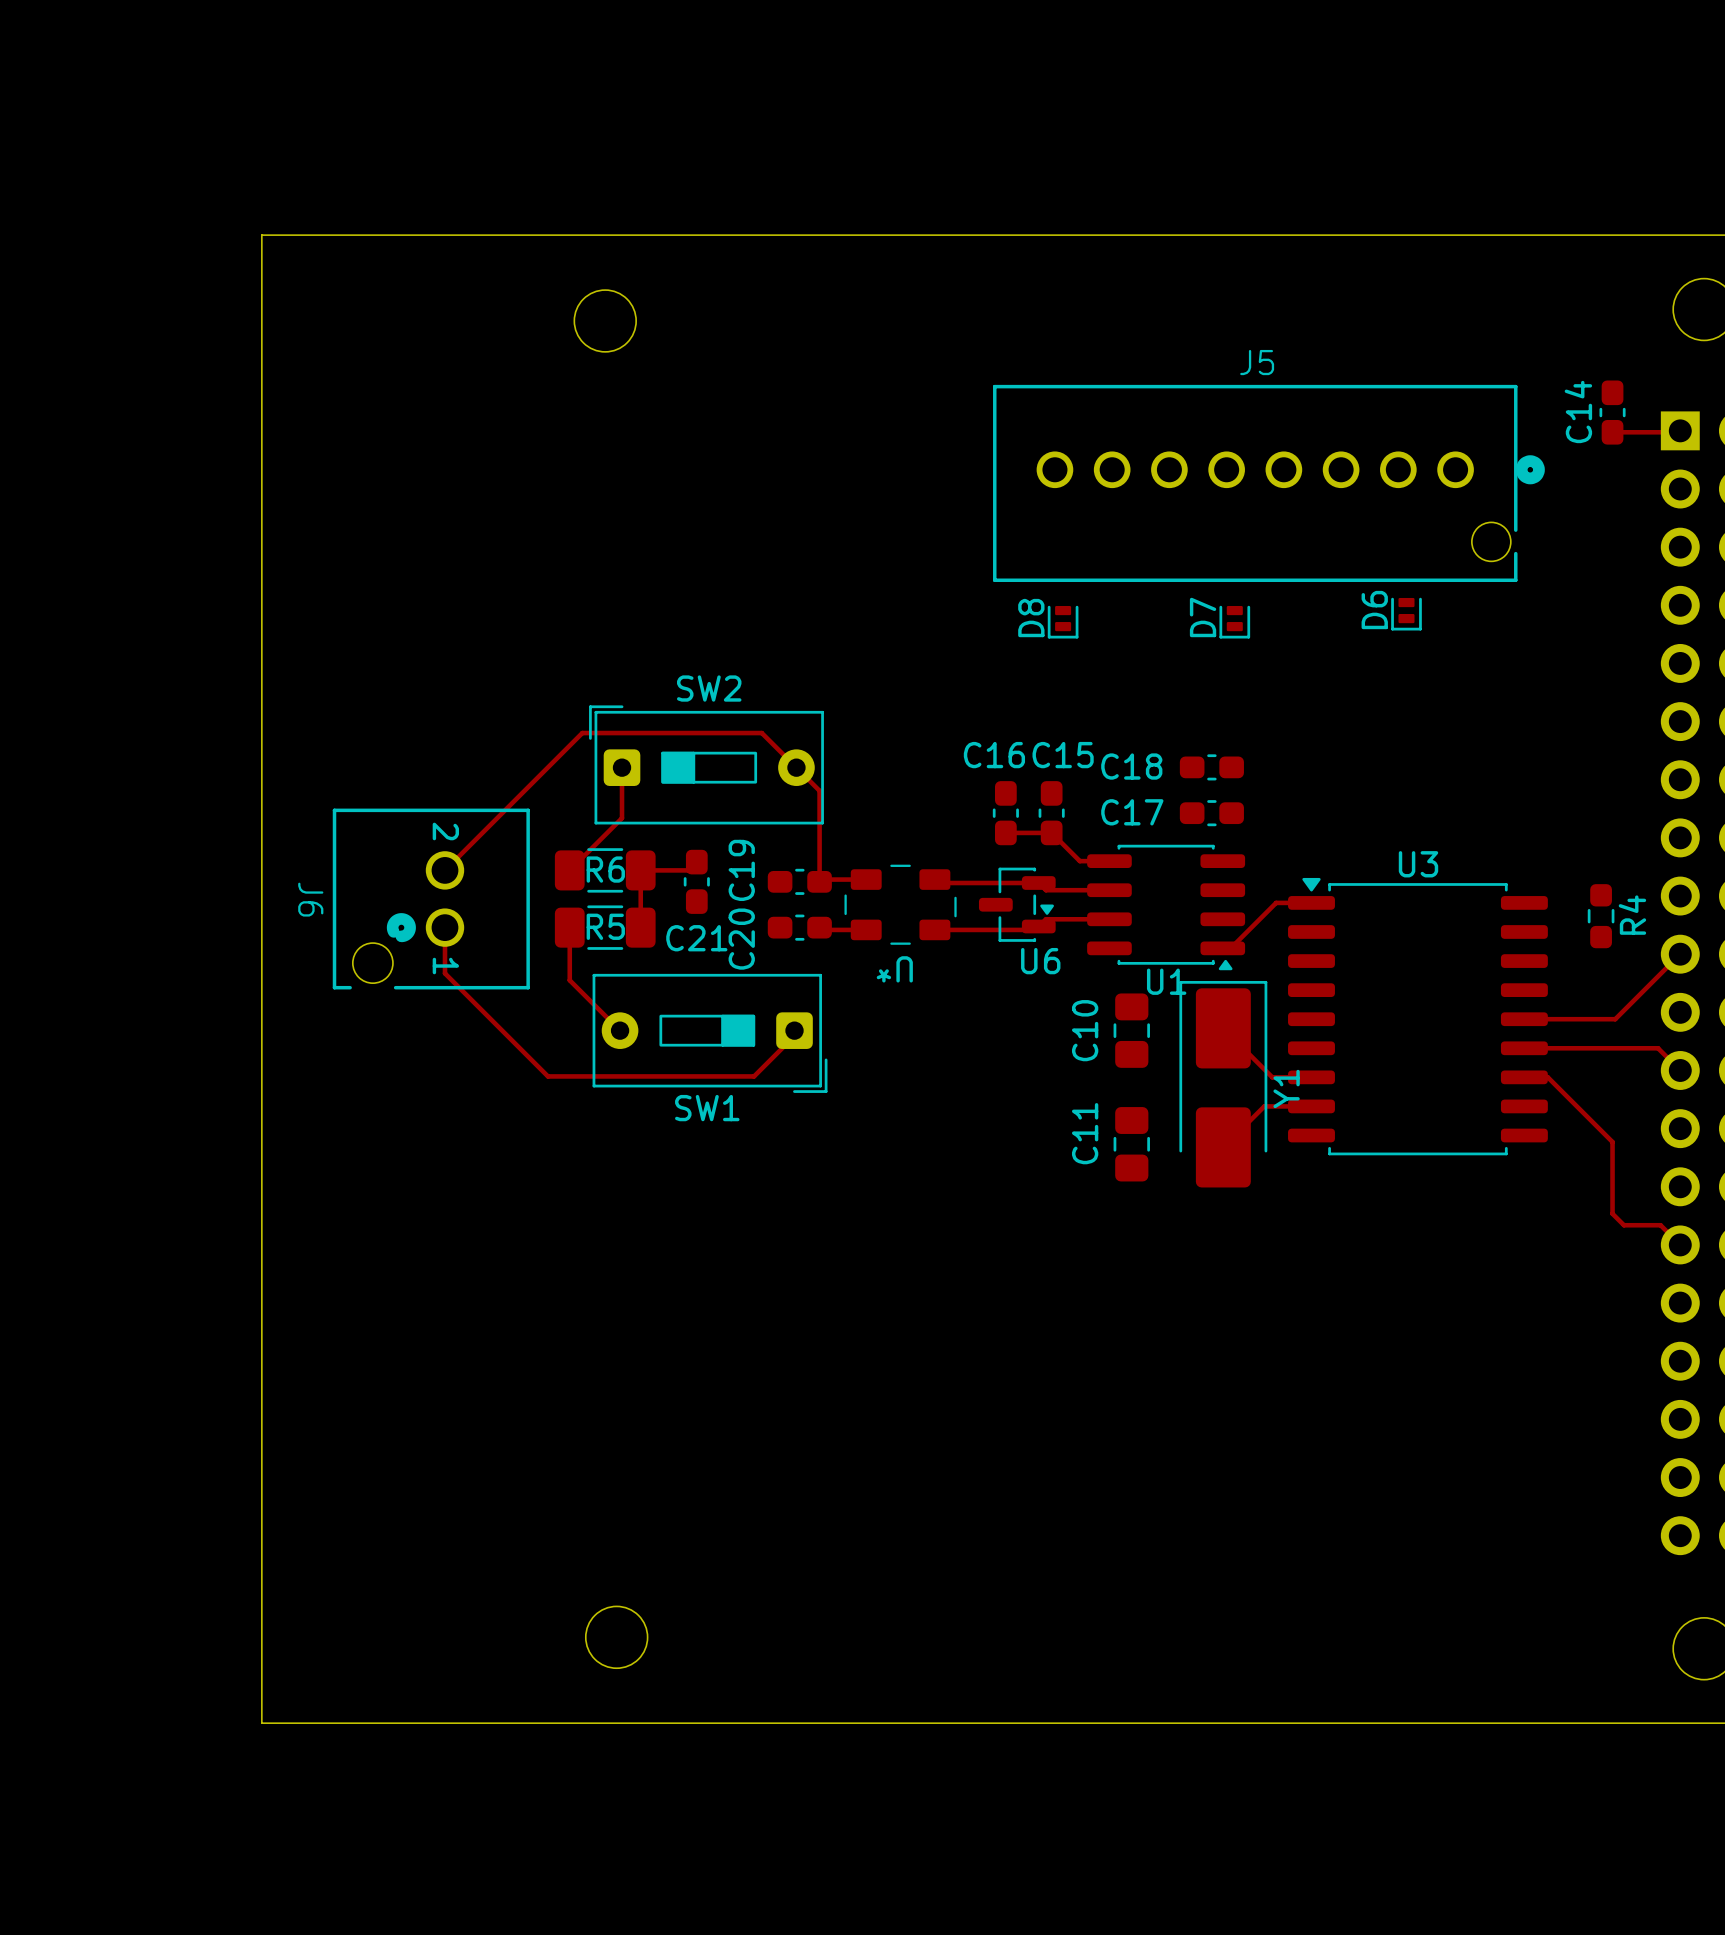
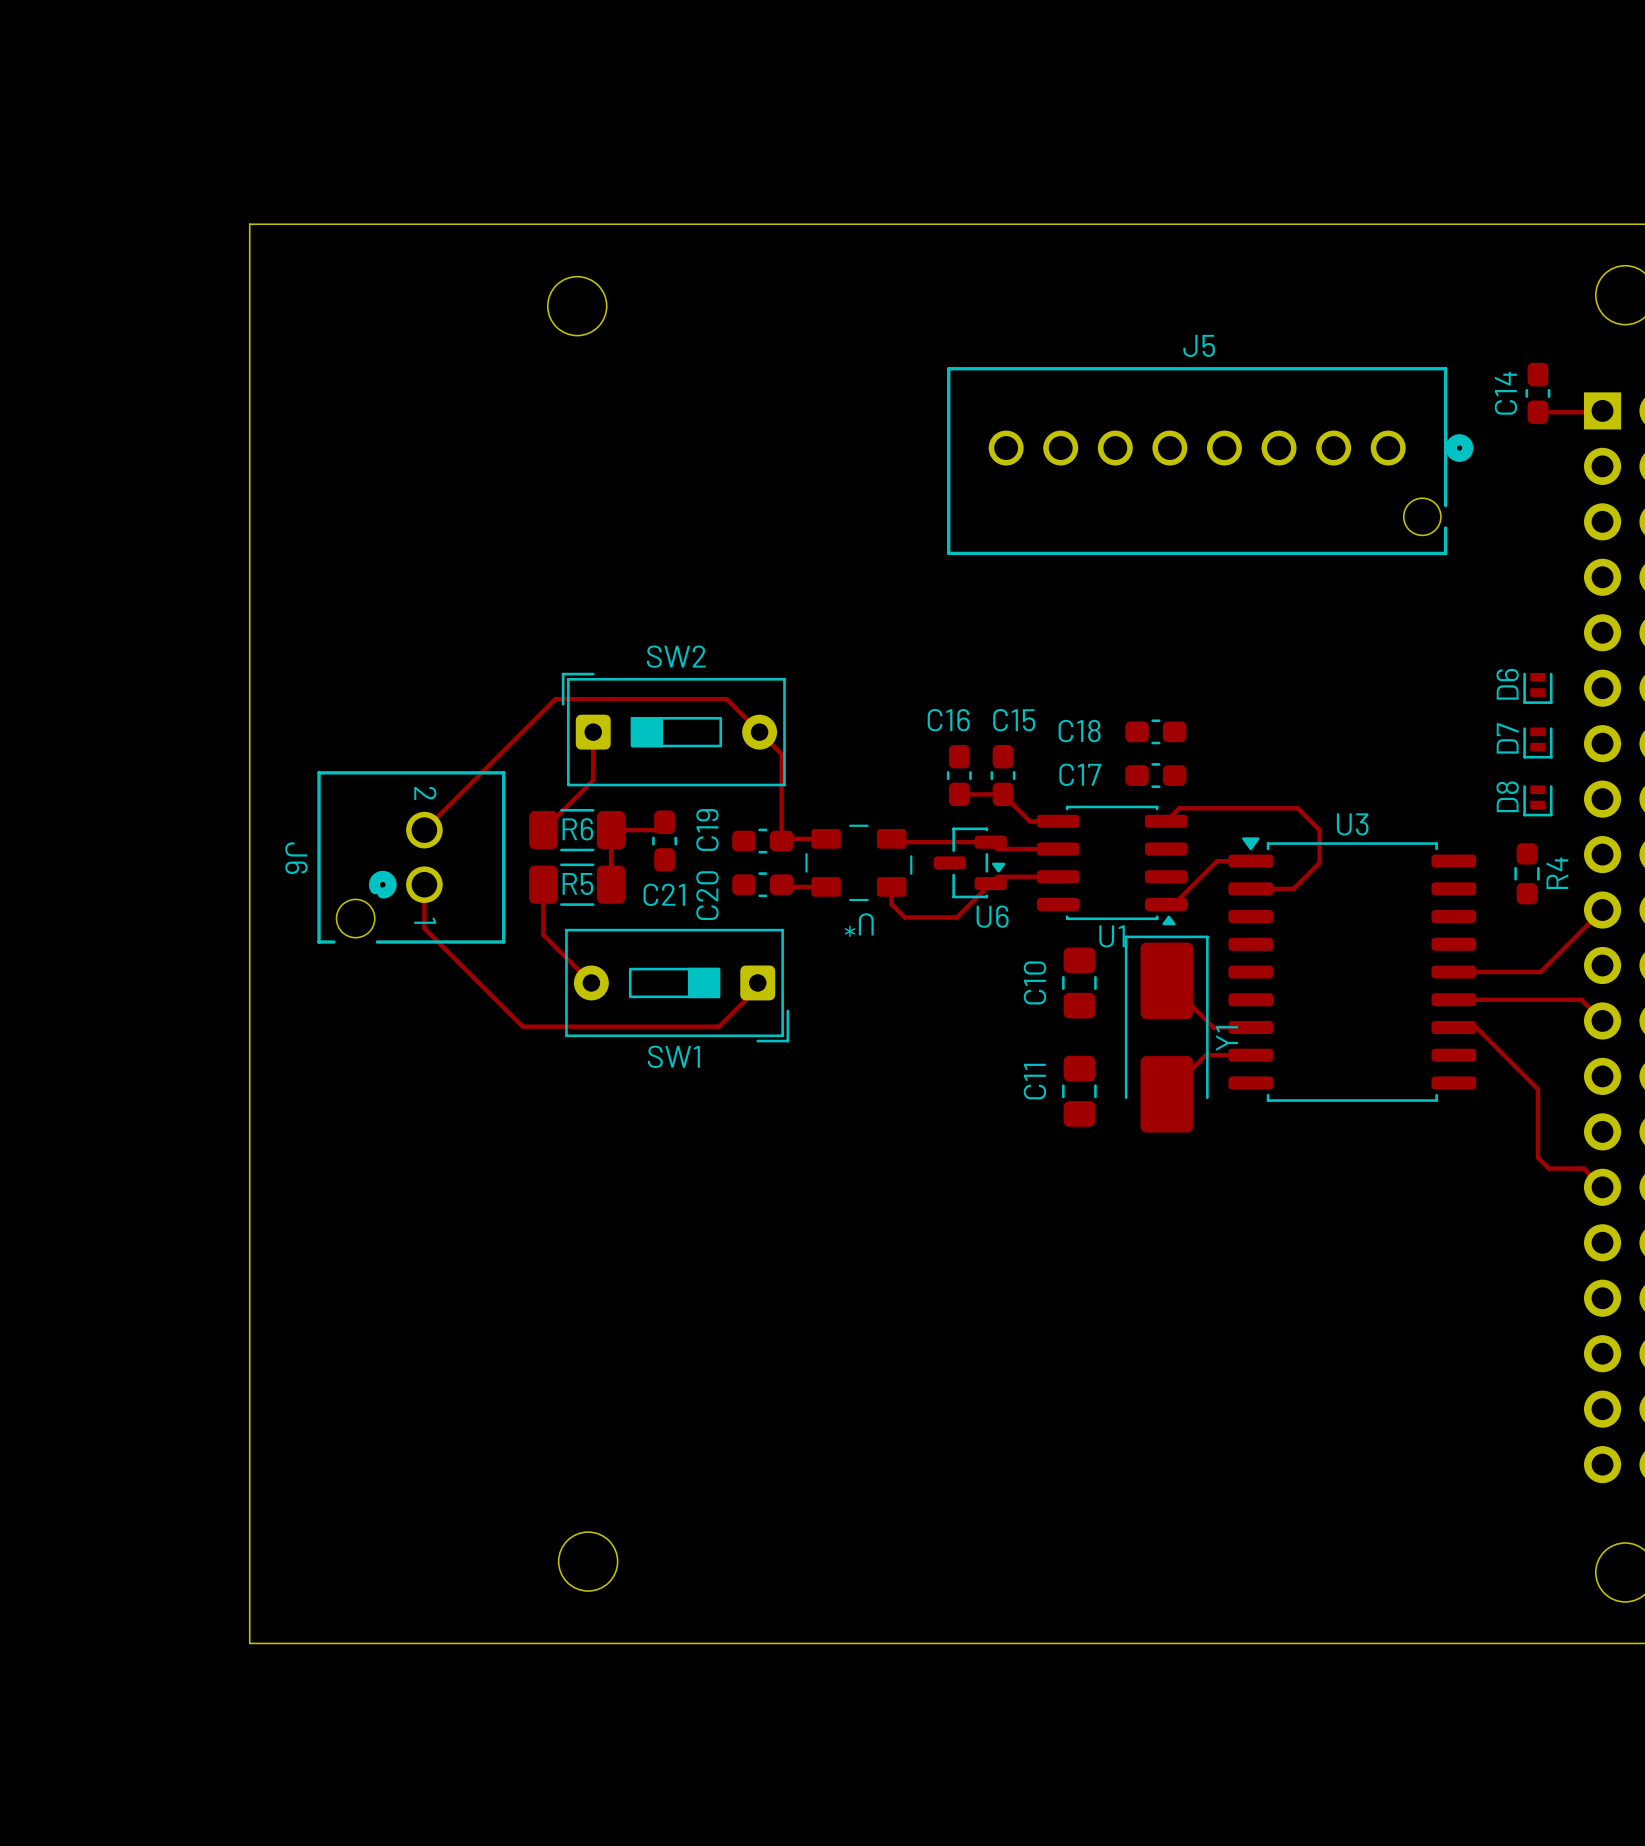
D6 position: (1406, 614) -> (1537, 688)
D8 position: (1063, 622) -> (1537, 800)
D7 position: (1234, 622) -> (1537, 742)
top track: none -> (1166, 821) (1179, 808) (1297, 808) (1319, 830) (1319, 862) (1293, 888) (1250, 888)
top track: (1038, 926) (1029, 926) (1026, 929) (934, 929) -> (990, 883) (956, 917) (904, 917) (891, 904) (891, 886)

